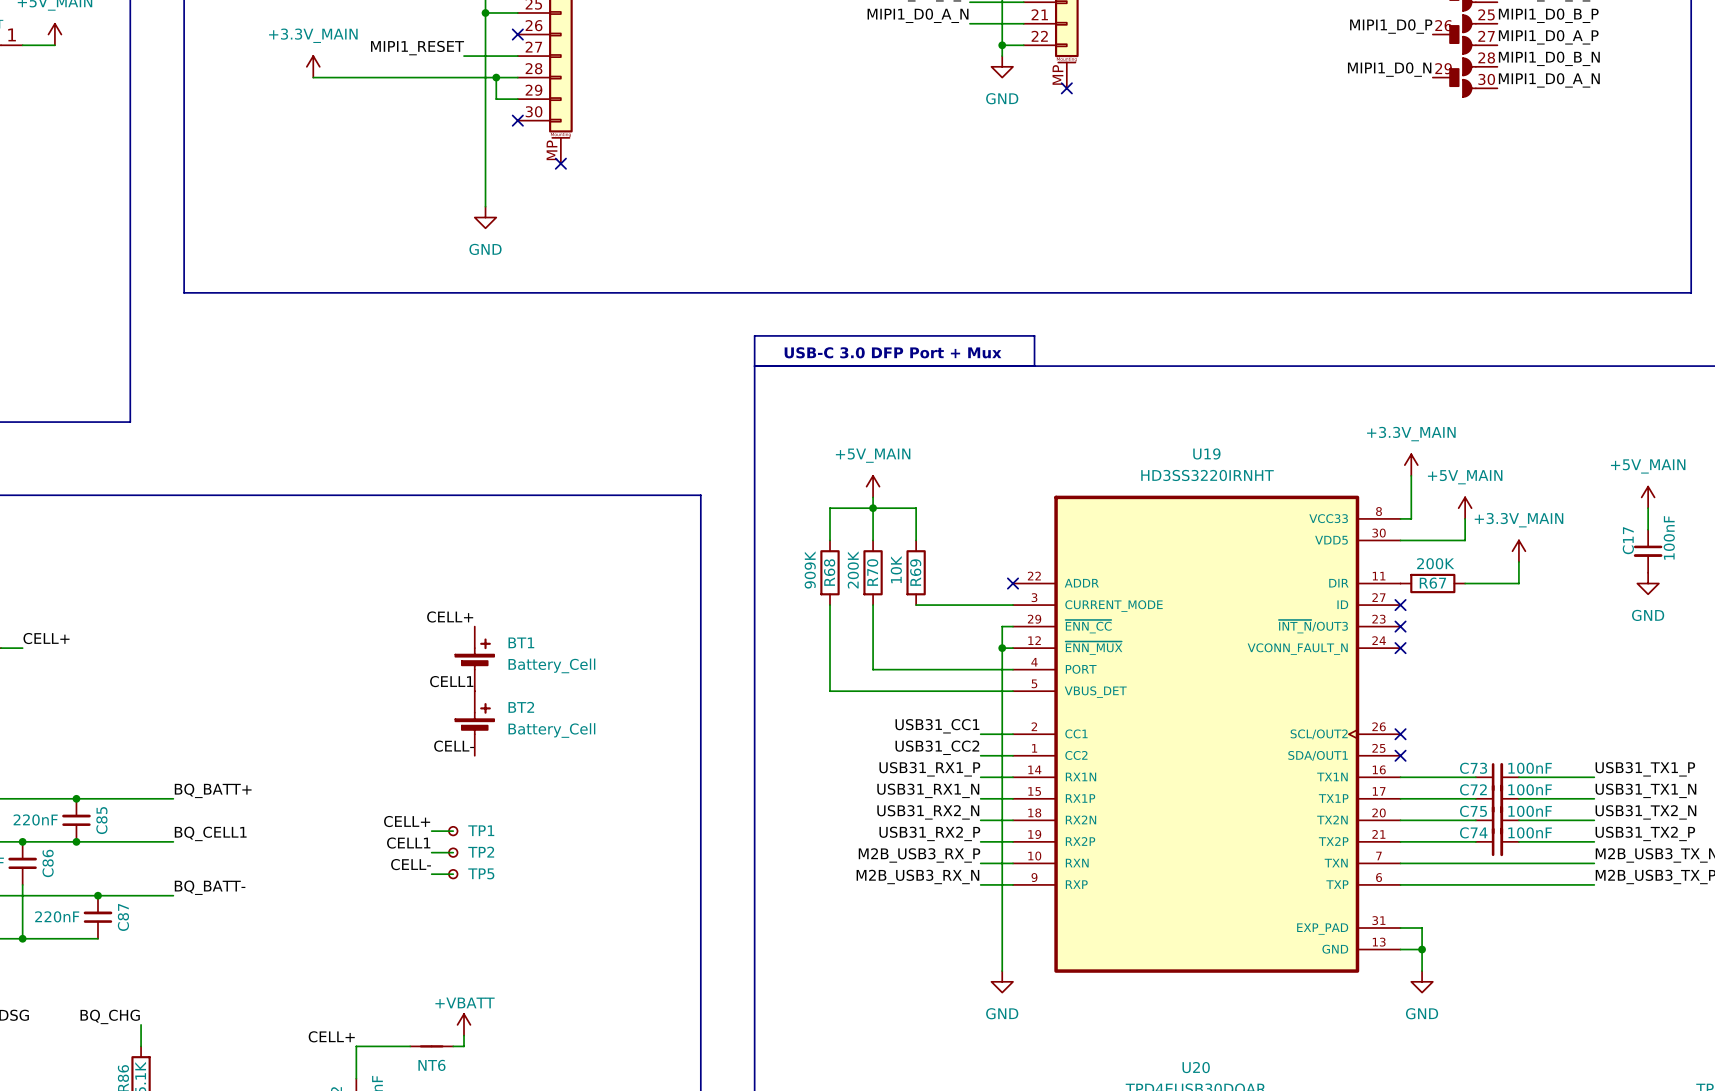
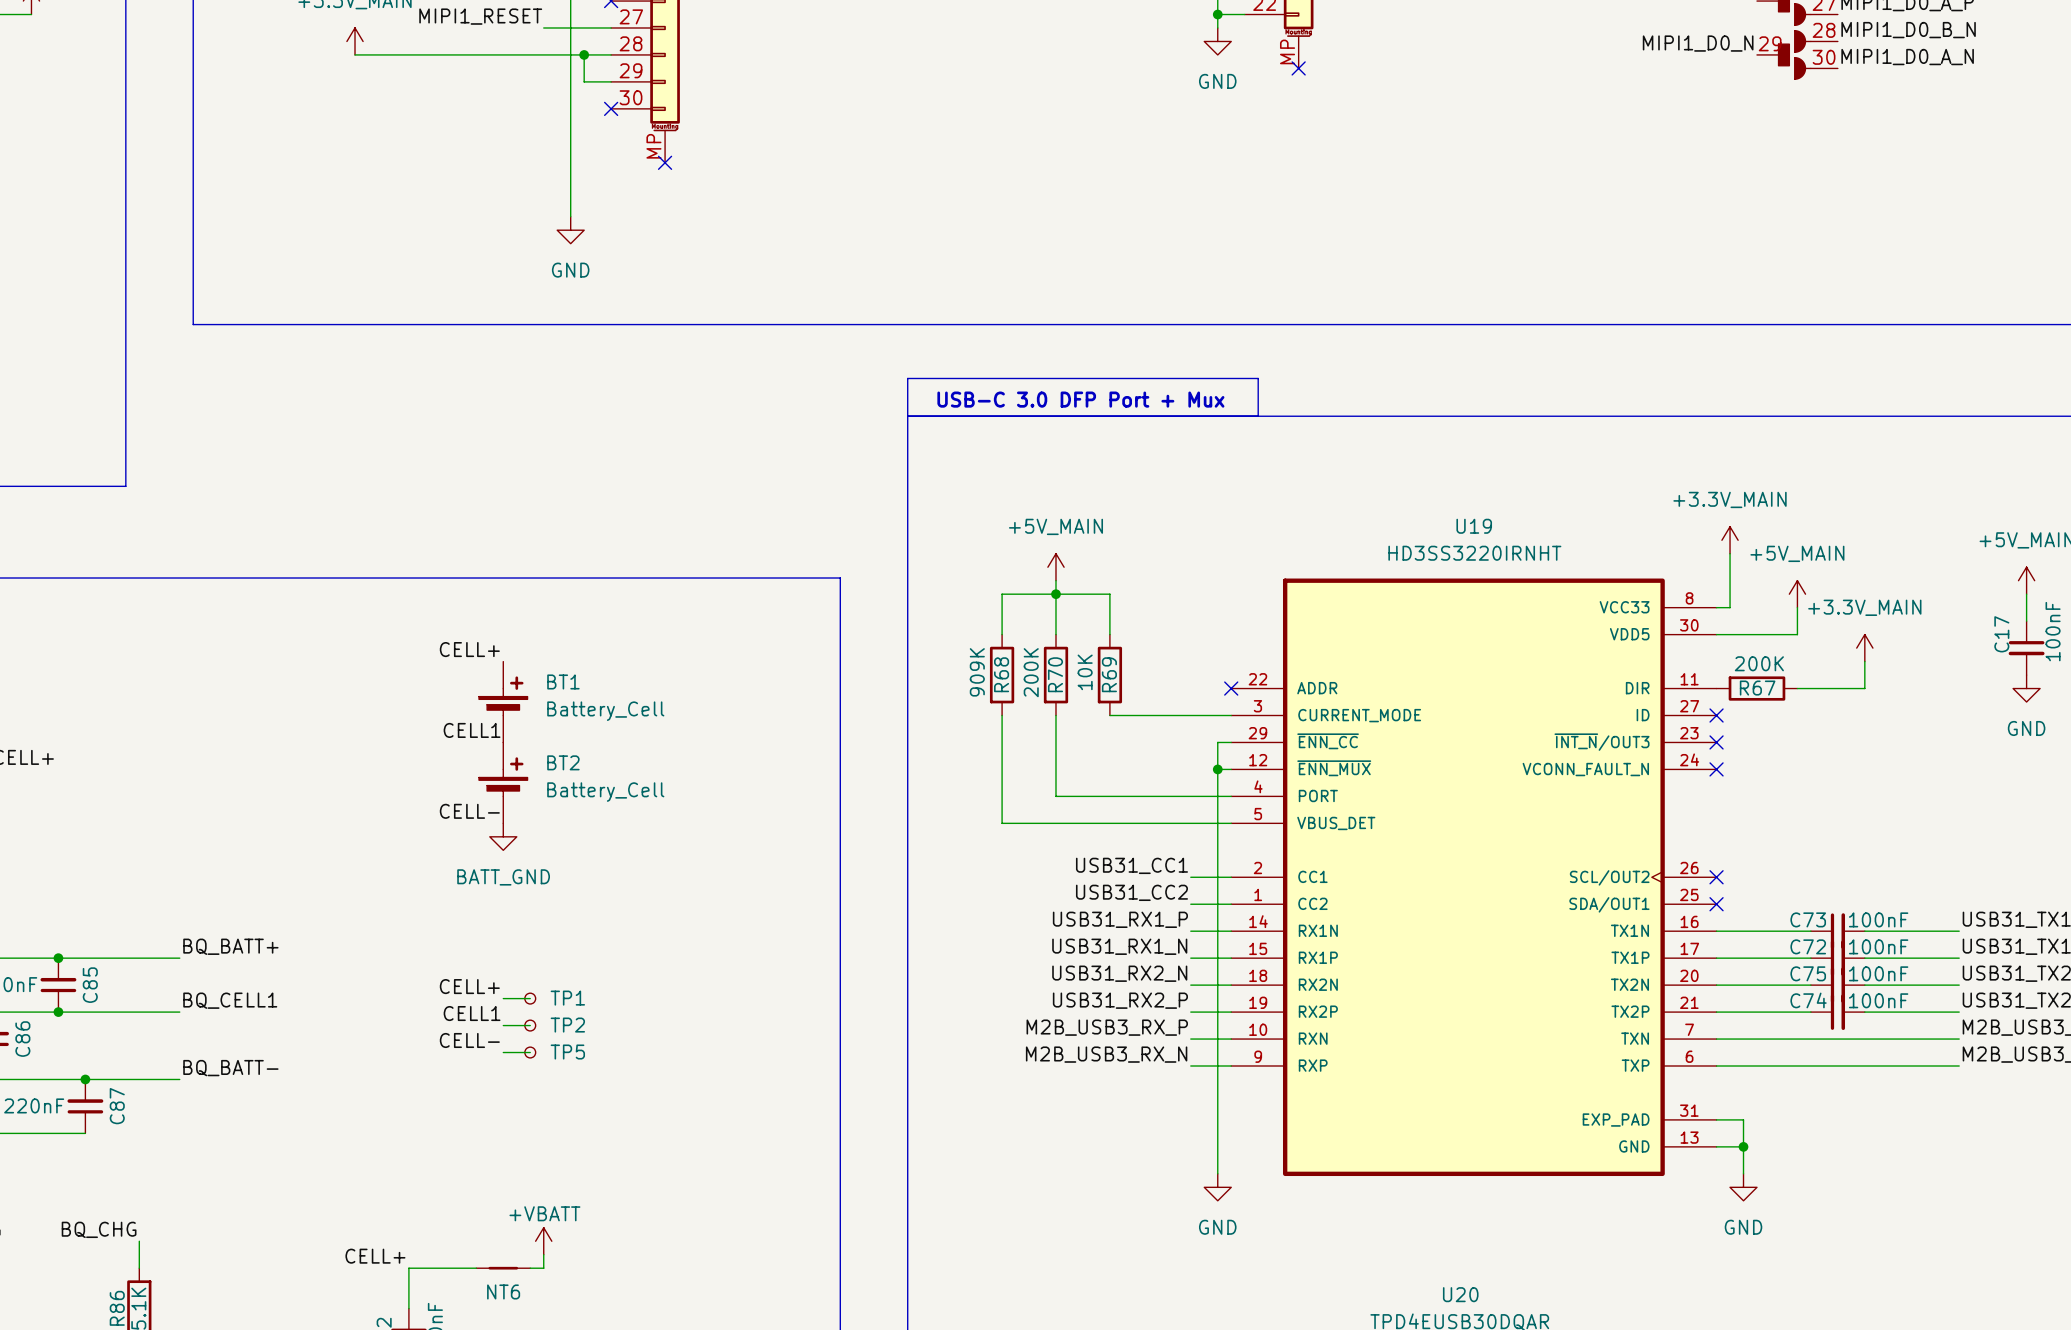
label position: CELL+ (450, 616) -> CELL+ (469, 649)
BT1 position: (474, 658) -> (503, 702)
label position: CELL1 (451, 681) -> CELL1 (472, 730)
power symbol: none -> BATT_GND (503, 836)
BT2 position: (474, 723) -> (503, 782)
label position: CELL- (454, 746) -> CELL- (469, 811)

